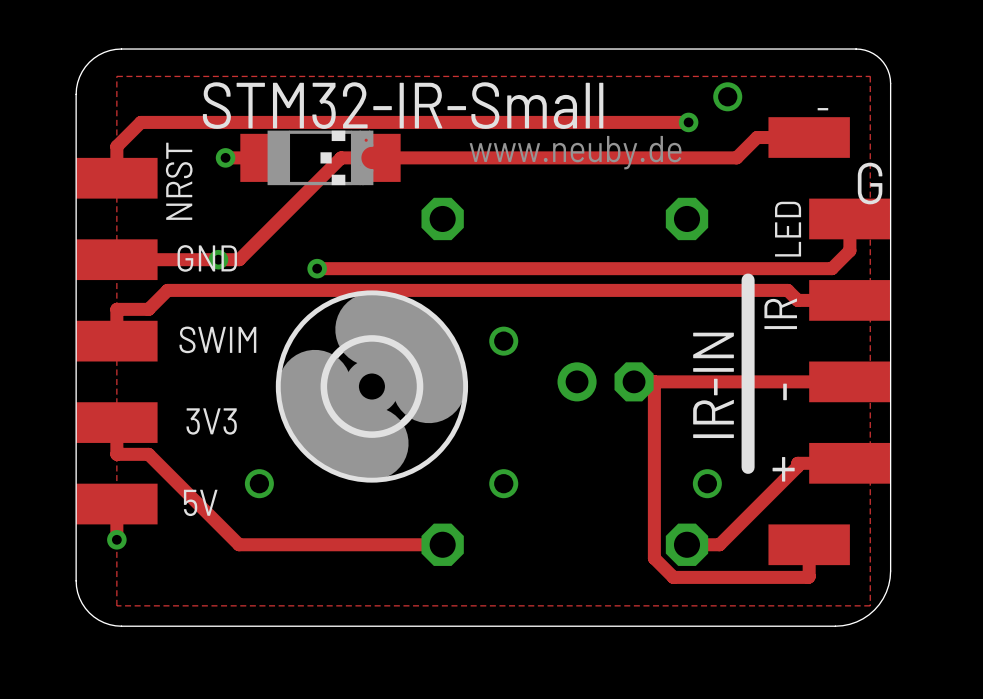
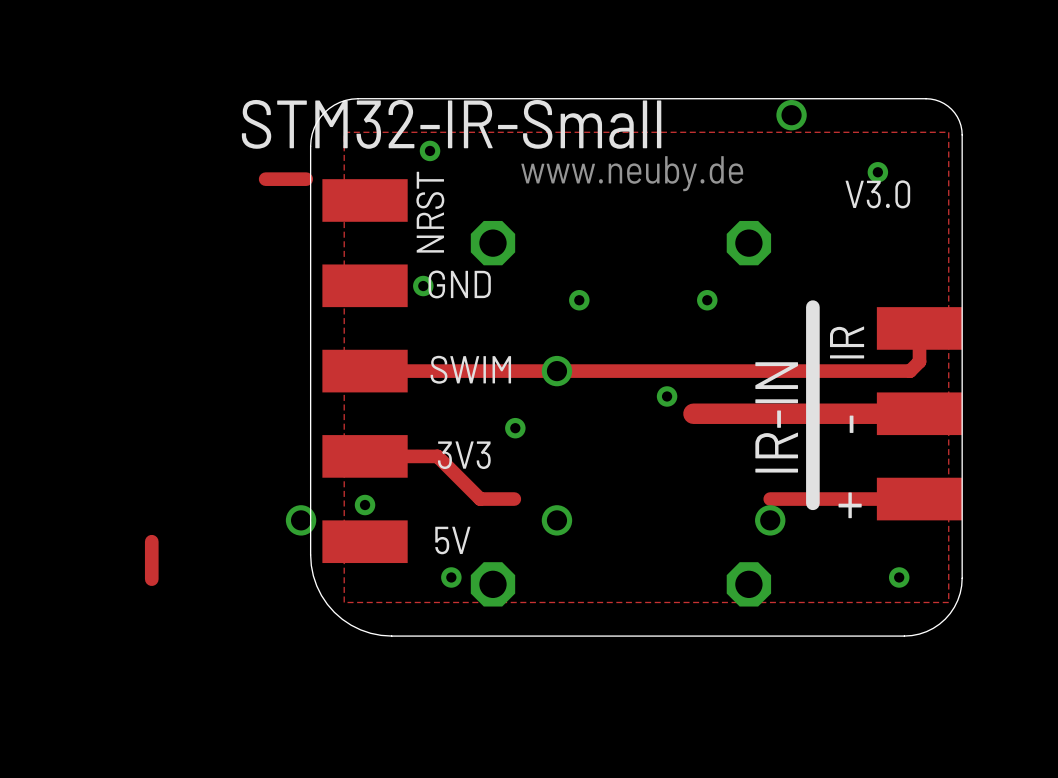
zone outline: (116, 76) (116, 605) (870, 605) (870, 76) (116, 76) -> (344, 132) (344, 602) (948, 602) (948, 132) (344, 132)
text: - (822, 109) -> none
board edge: (890, 115) (890, 83) (887, 70) (877, 56) (860, 49) (121, 49) (109, 50) (98, 55) (89, 62) (82, 71) (77, 82) (76, 94) (76, 580) (79, 598) (89, 612) (104, 622) (121, 626) (835, 626) (849, 624) (863, 618) (874, 610) (883, 598) (890, 578) (890, 538) -> (962, 134) (959, 121) (951, 109) (939, 101) (926, 98) (358, 98) (339, 102) (324, 112) (314, 128) (310, 146) (311, 565) (321, 595) (334, 612) (351, 625) (370, 633) (391, 636) (911, 635) (933, 628) (950, 613) (960, 593) (962, 578)
track: (688, 122) (140, 122) (116, 146) (116, 178) -> none
via: (688, 122) -> none
part footprint: [240, 130, 401, 186] -> [322, 179, 408, 222]
via: none -> (430, 150)
track: (809, 137) (757, 137) (736, 157) (341, 157) (239, 259) (116, 259) -> none
G: (809, 137) -> none
via: none -> (877, 172)
via: (225, 157) -> none
text: none -> V3.0 (877, 194)
part: (116, 178) -> none
text position: NRST (179, 181) -> NRST (430, 212)
track: (849, 218) (849, 250) (831, 268) (317, 268) -> none
part: (849, 218) -> none
text: LED (788, 229) -> none
text position: GND (207, 258) -> GND (459, 284)
part: (116, 259) -> none
via: (218, 259) -> none
part: none -> (365, 285)
via position: (317, 268) -> (423, 286)
via: none -> (579, 300)
via: none -> (707, 300)
track: (849, 300) (797, 300) (787, 290) (167, 290) (148, 309) (116, 309) (116, 341) -> (919, 328) (919, 361) (910, 371) (365, 371)
text position: SWIM (217, 339) -> SWIM (470, 369)
part: (116, 341) -> none
part: none -> (365, 371)
via: none -> (667, 396)
part: (605, 381) -> none
track width: thin (634, 381) (849, 381) -> thick (693, 413) (919, 413)
track: (654, 381) (654, 558) (673, 577) (808, 577) (809, 544) -> none
part: (371, 386) -> none
via: none -> (515, 428)
text position: 3V3 (211, 421) -> 3V3 (464, 455)
track: (116, 422) (116, 454) (148, 454) (239, 544) (442, 544) -> none
part: (116, 422) -> none
track: none -> (365, 456) (437, 456) (480, 499) (514, 499)
part: none -> (365, 456)
track: (797, 463) (797, 466) (719, 544) (687, 544) -> (864, 499) (770, 499)
via: none -> (365, 505)
text position: 5V (200, 502) -> 5V (452, 540)
part: (116, 504) -> none
part: none -> (365, 541)
via: none -> (451, 577)
via: none -> (899, 577)
via: (116, 539) -> none
part: (809, 544) -> none

